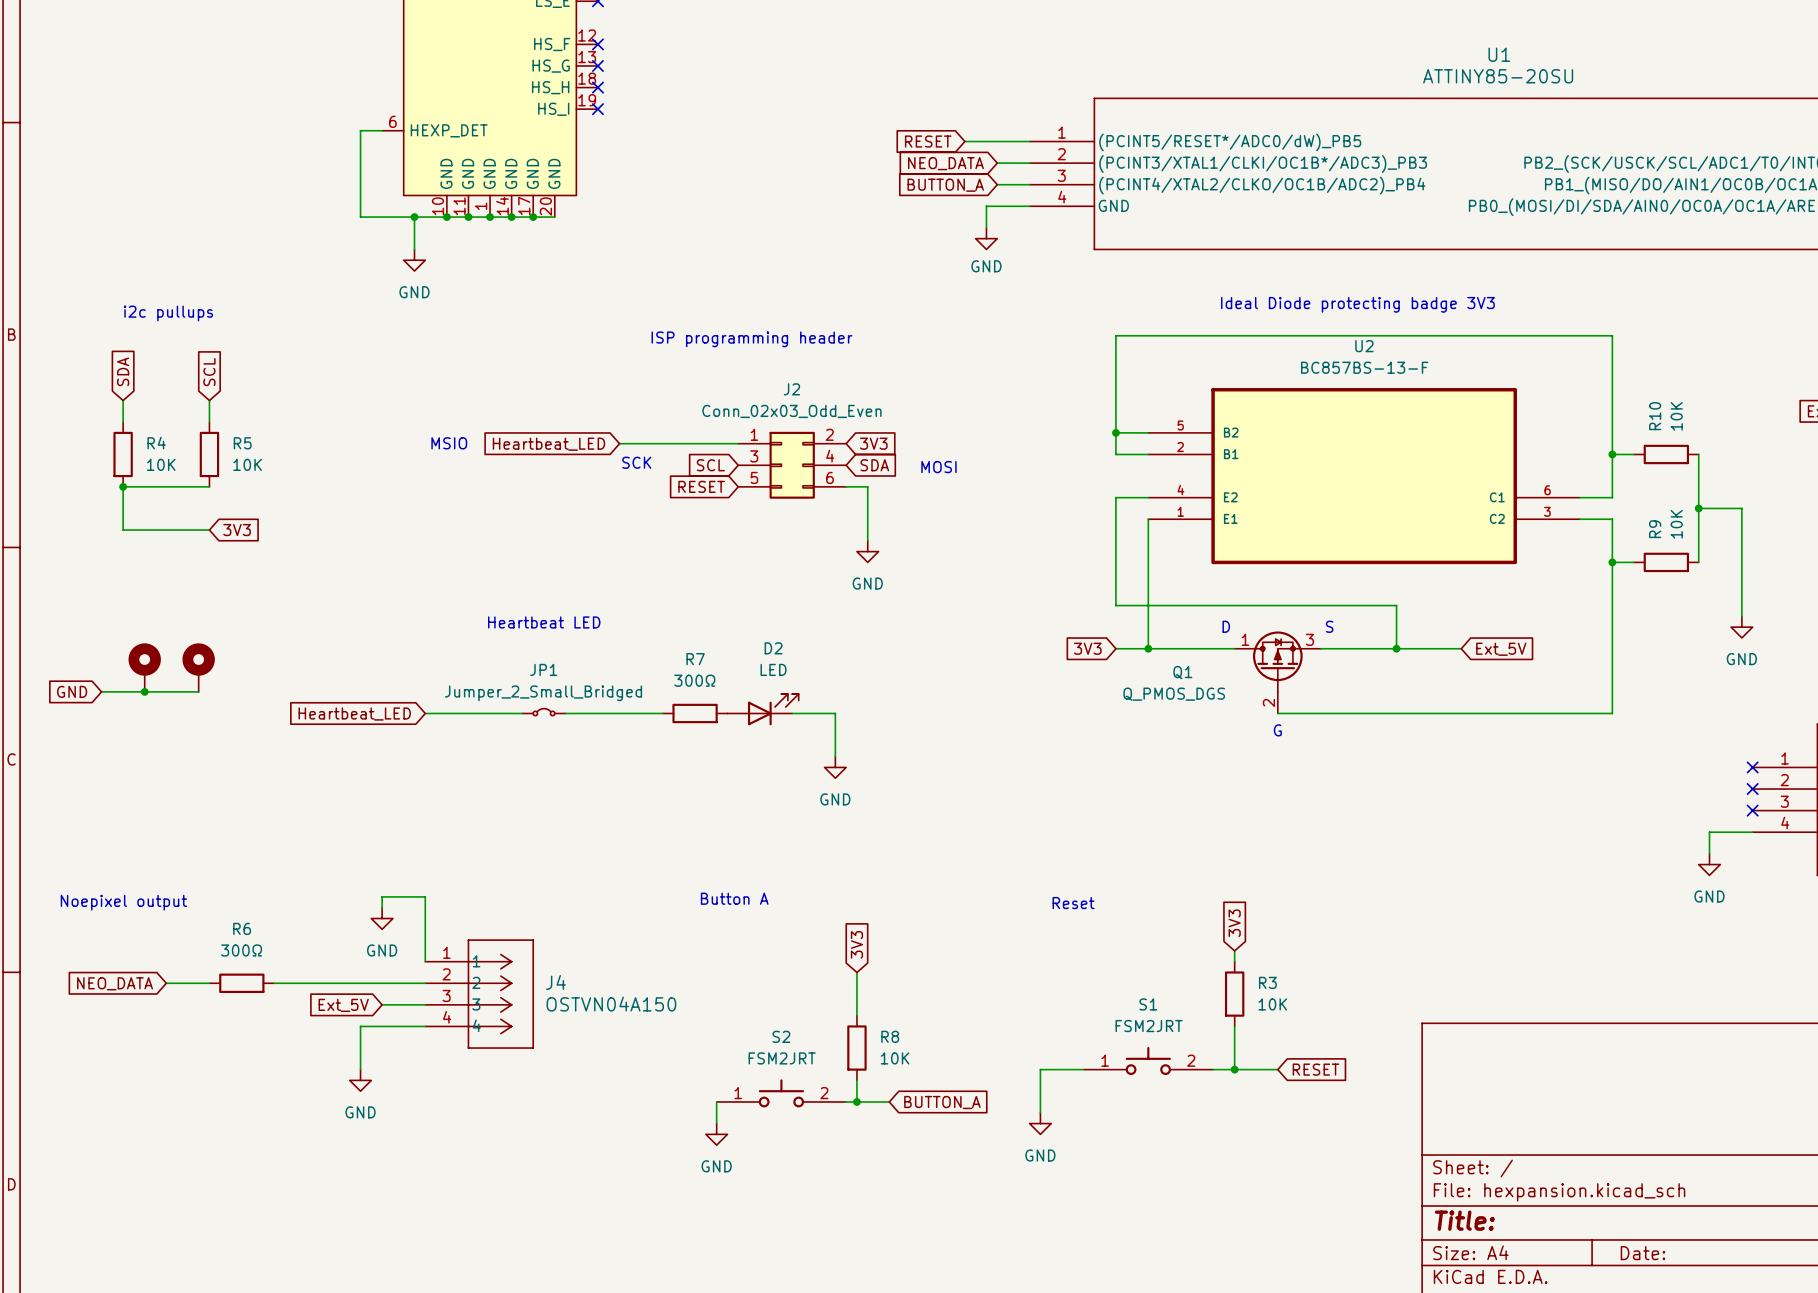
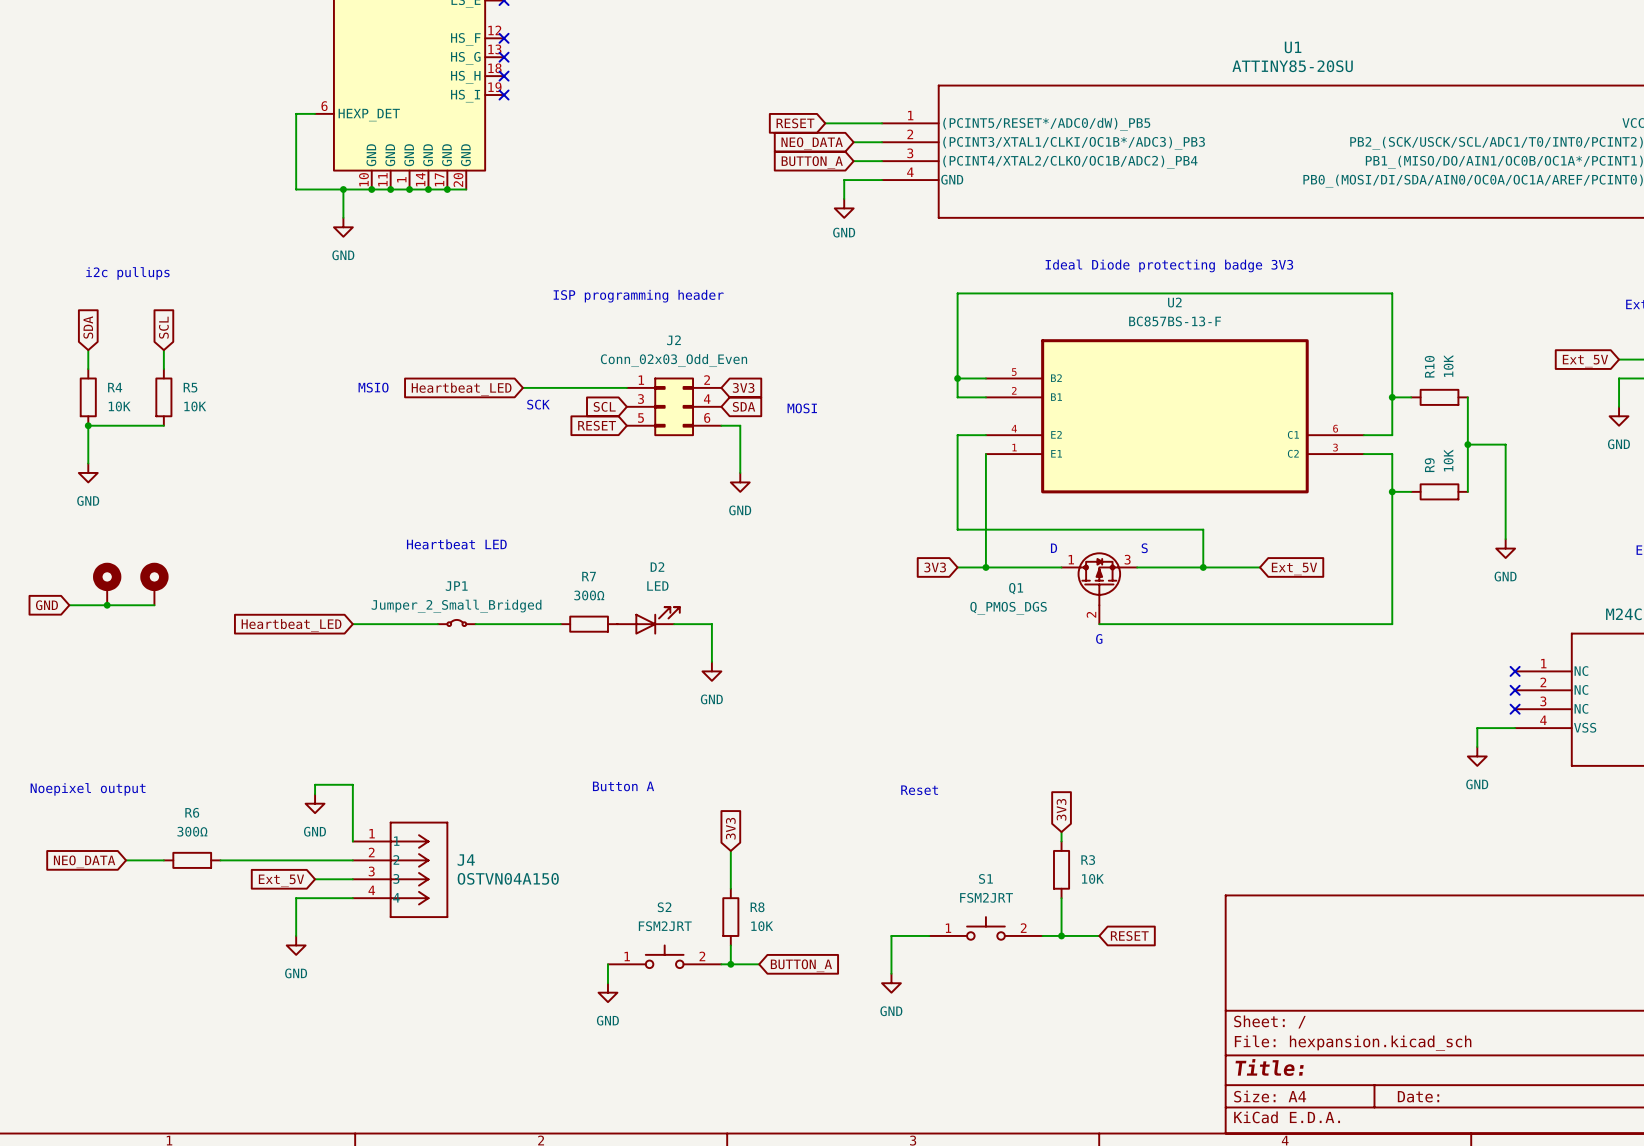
wire: (123, 530) (209, 530) -> none
global label: 3V3 (237, 530) -> none
power symbol: none -> GND (88, 472)

